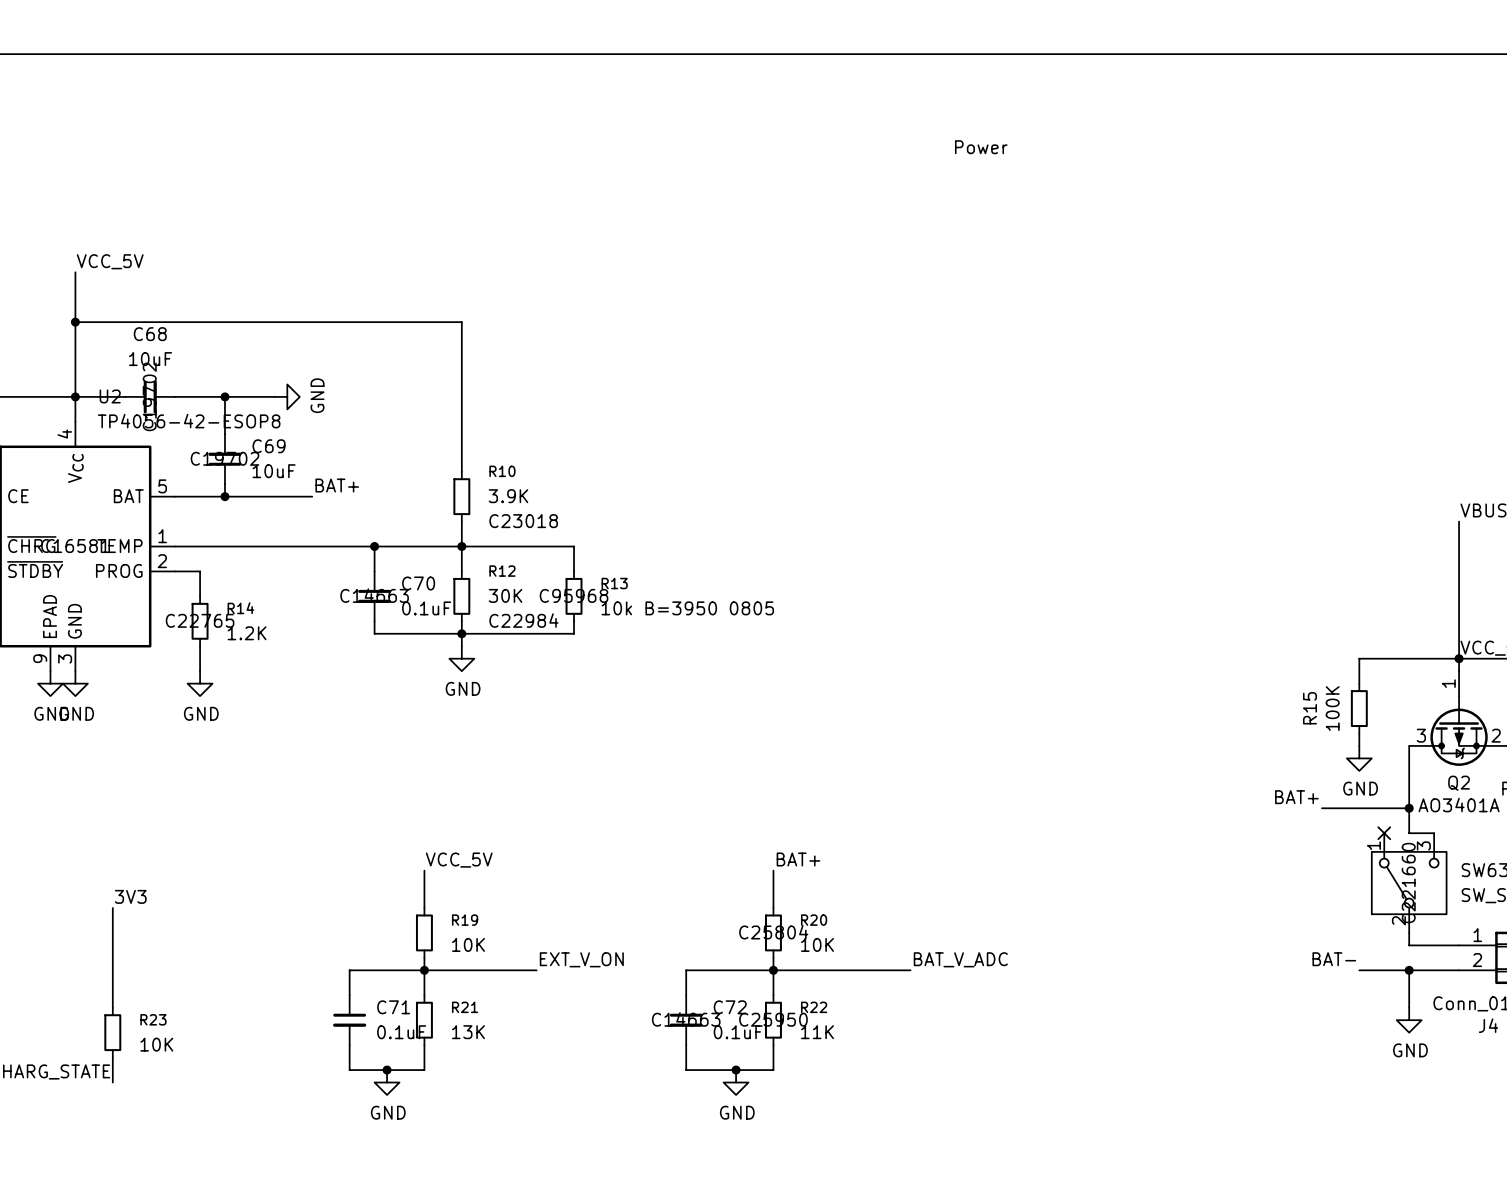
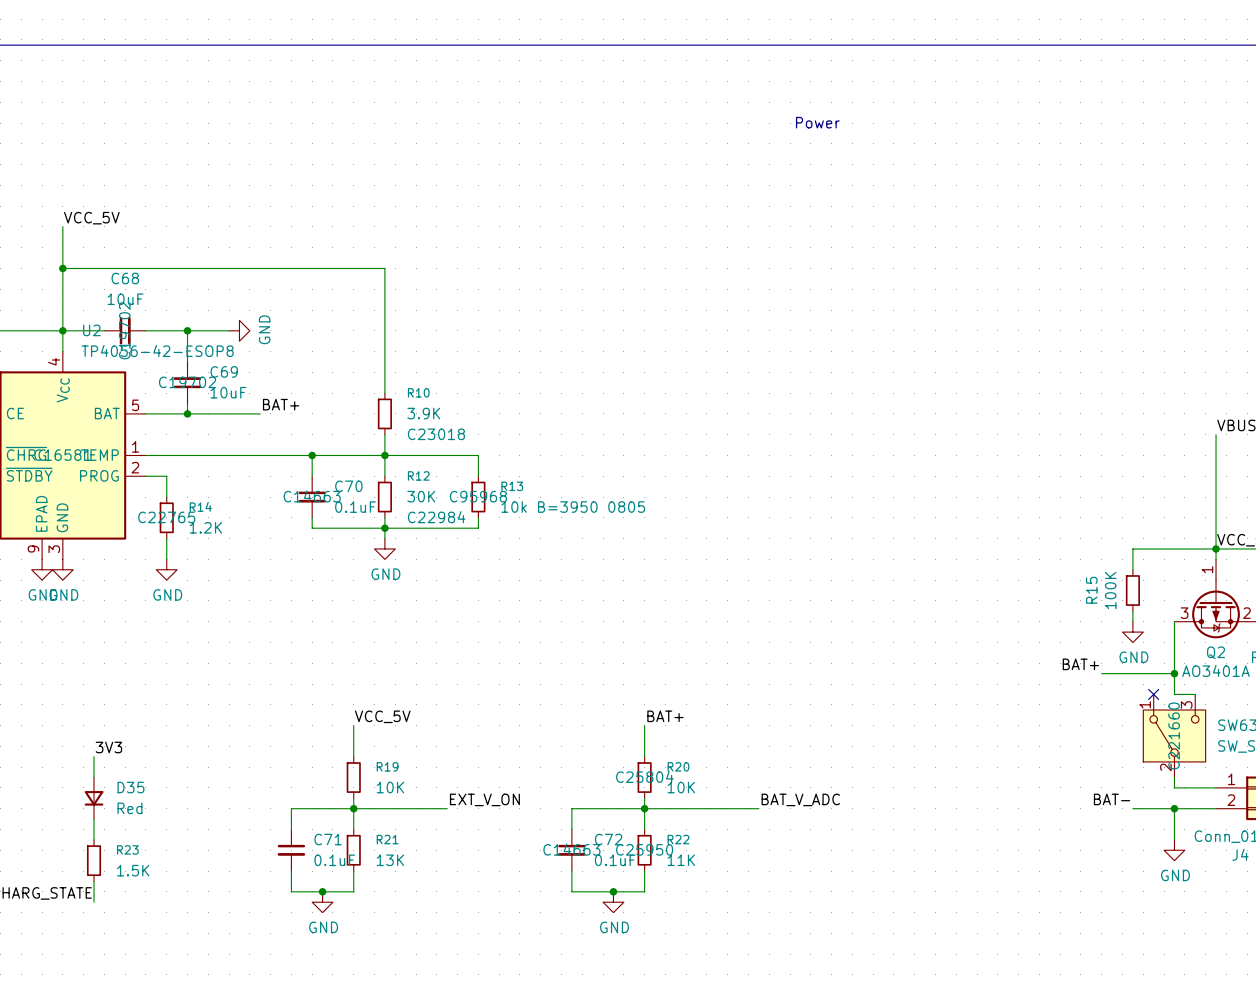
D35: none -> Red (94, 798)
R23 value: 10K (156, 1044) -> 1.5K (133, 870)

